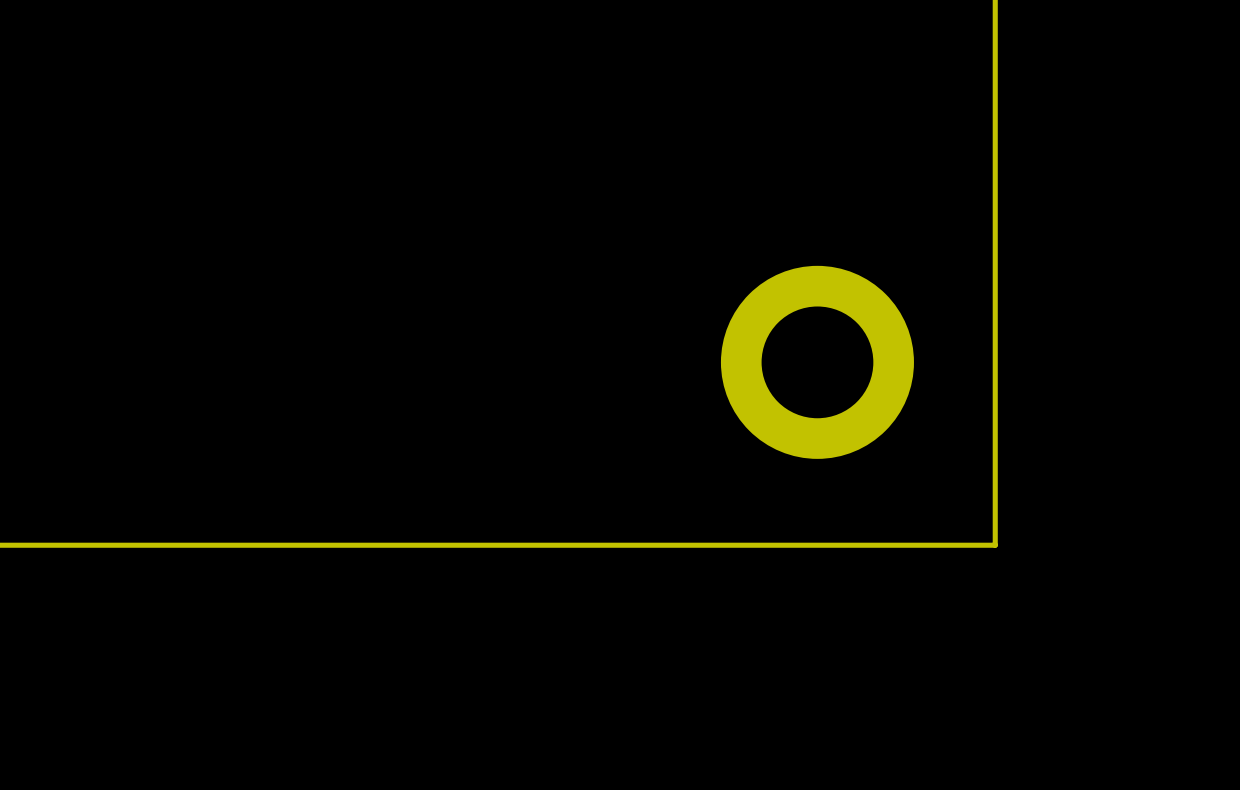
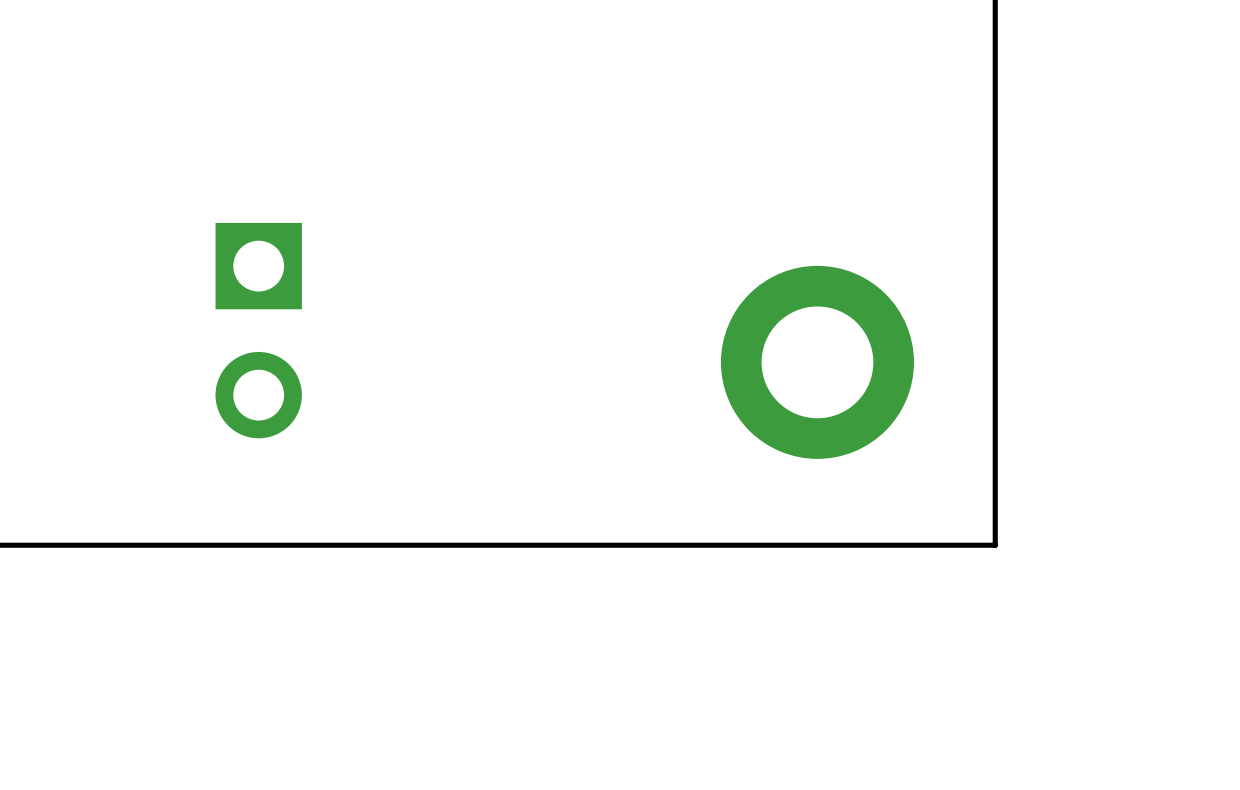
part: none -> (258, 330)

